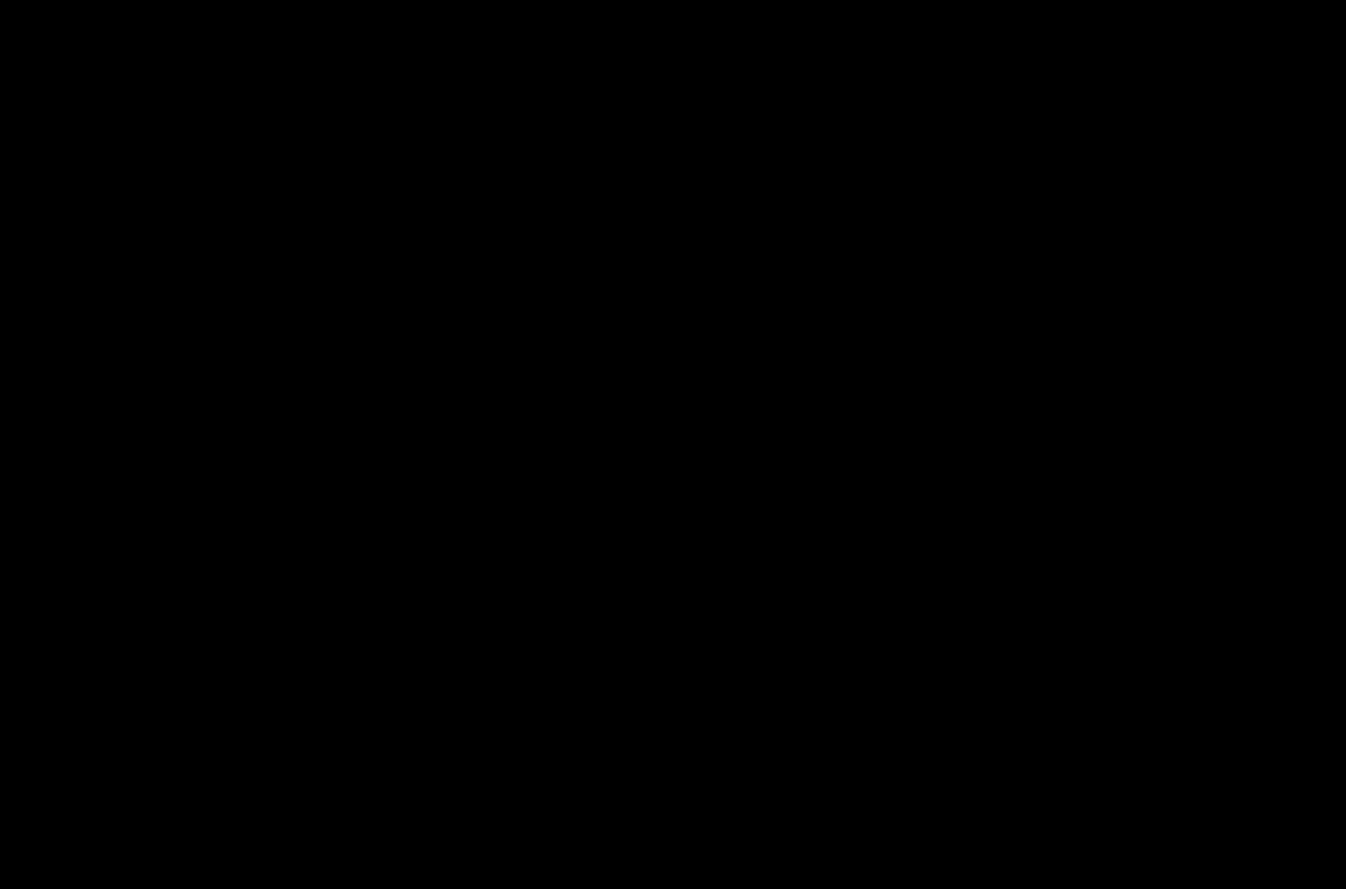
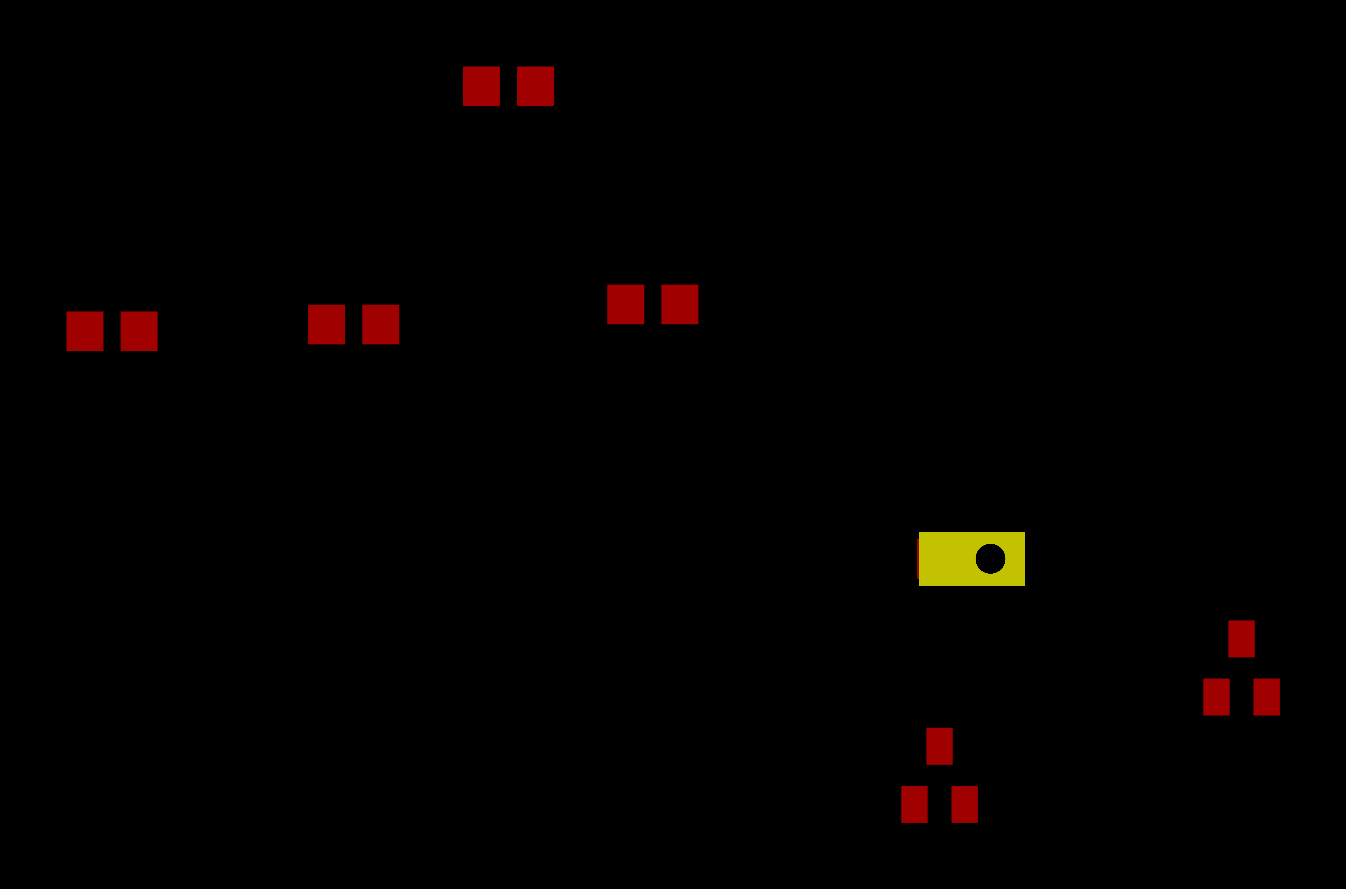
part: none -> (508, 86)
part: none -> (652, 304)
part: none -> (353, 324)
part: none -> (112, 331)
part: none -> (972, 558)
part: none -> (1241, 667)
part: none -> (939, 775)

